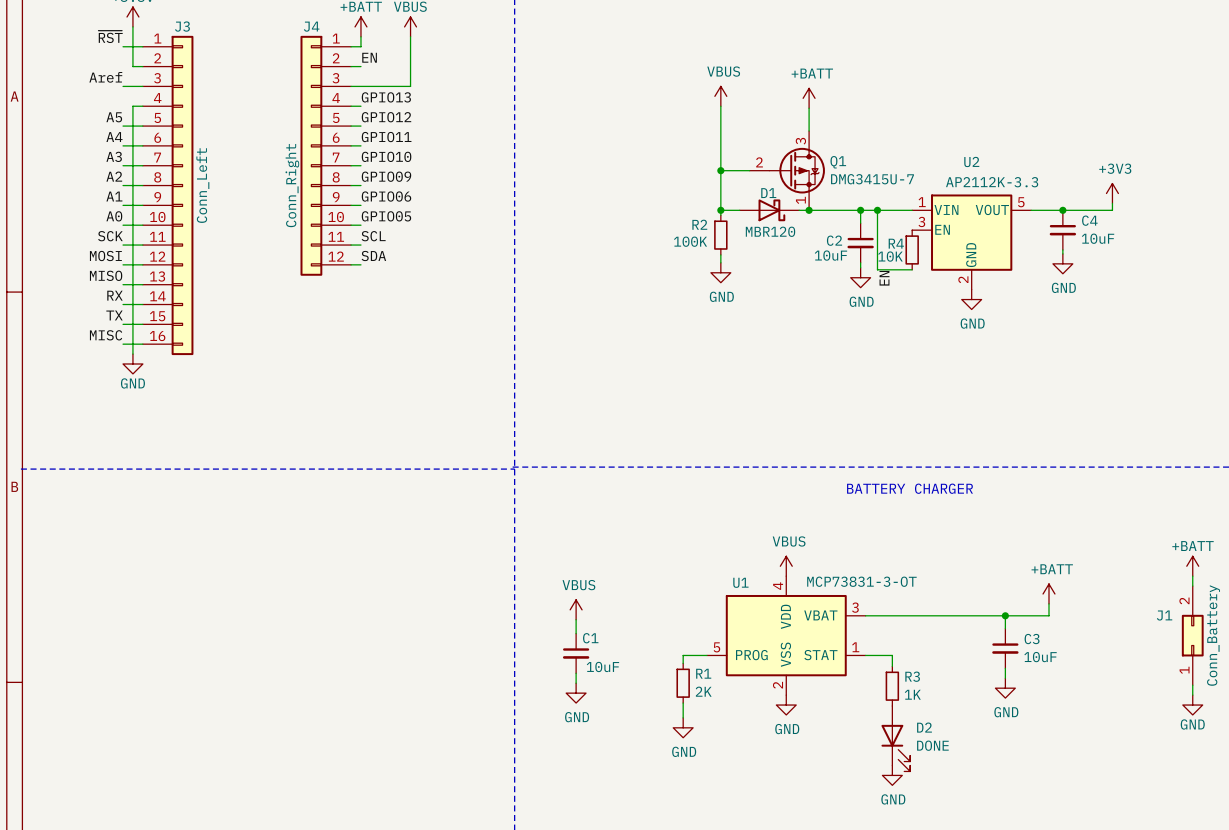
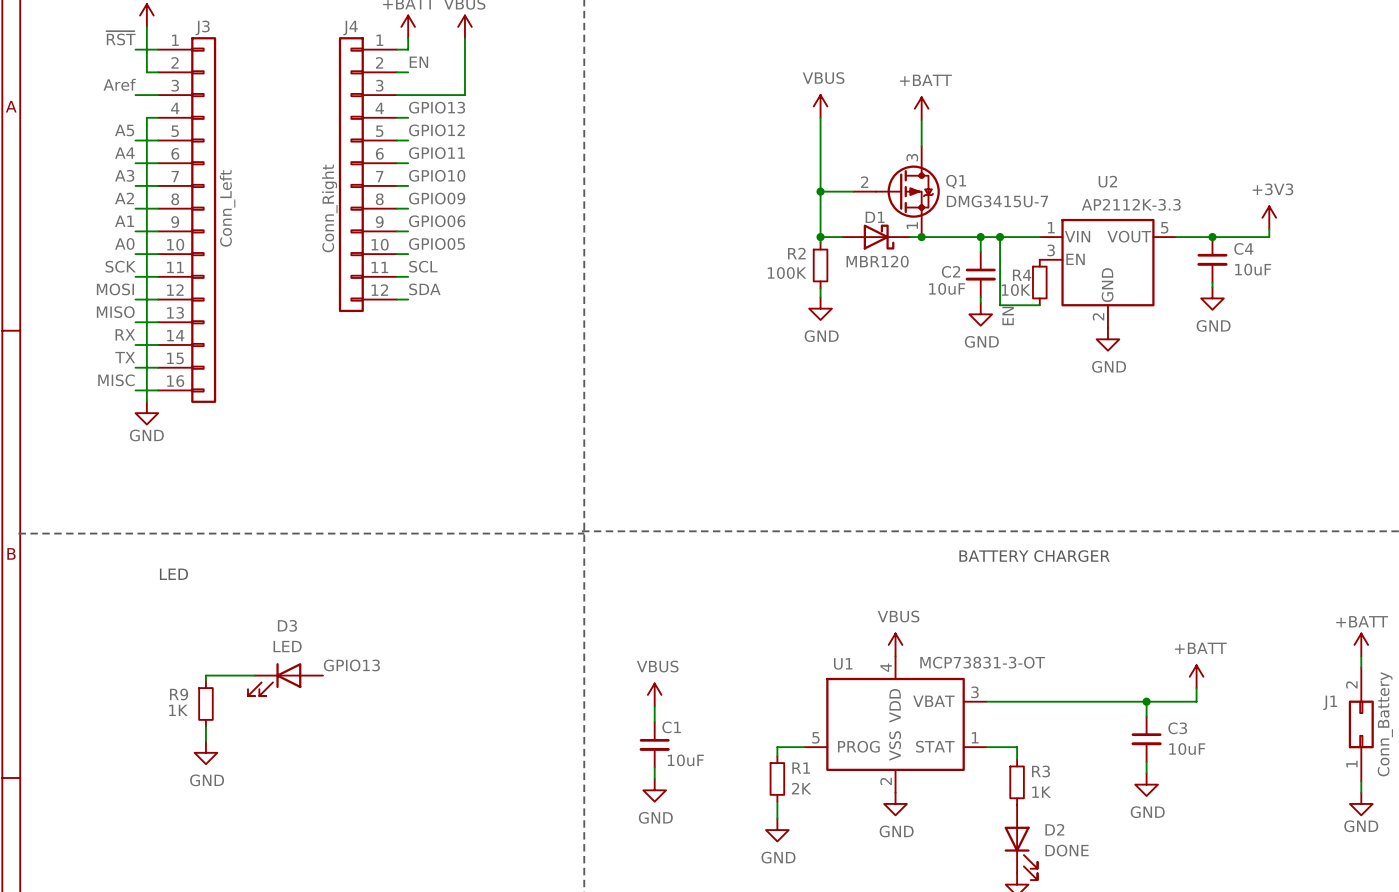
text: none -> LED (173, 574)
label: none -> GPIO13 (351, 665)
wire: none -> (254, 675) (205, 675) (205, 681)
D3: none -> LED (285, 679)
R9: none -> 1K (205, 703)
wire: none -> (205, 726) (205, 741)
power symbol: none -> GND (205, 752)

